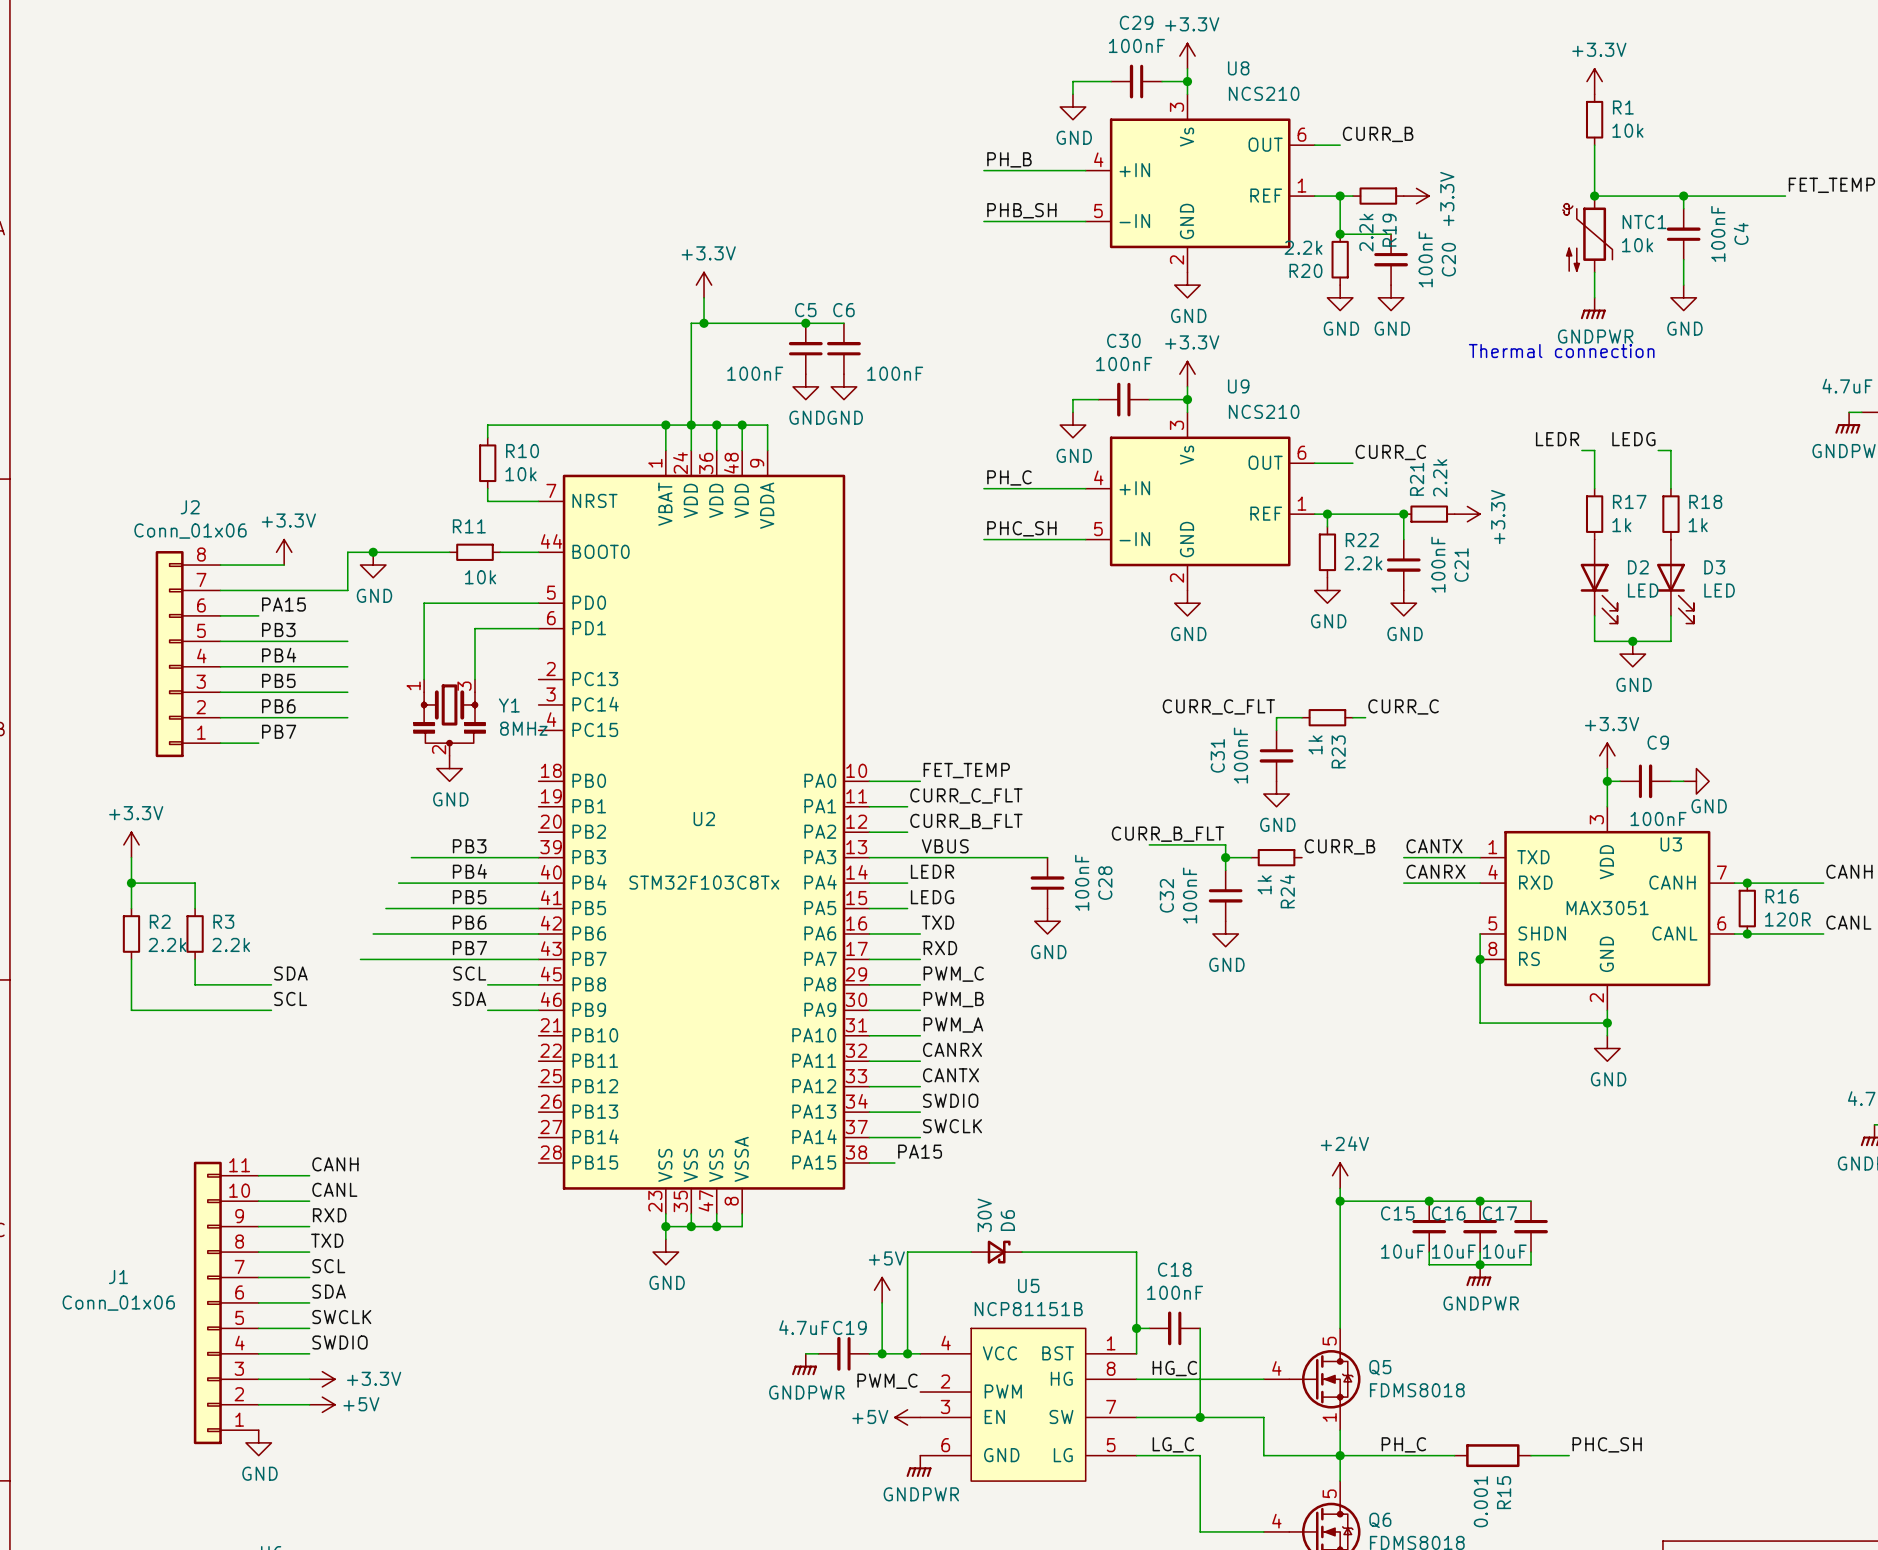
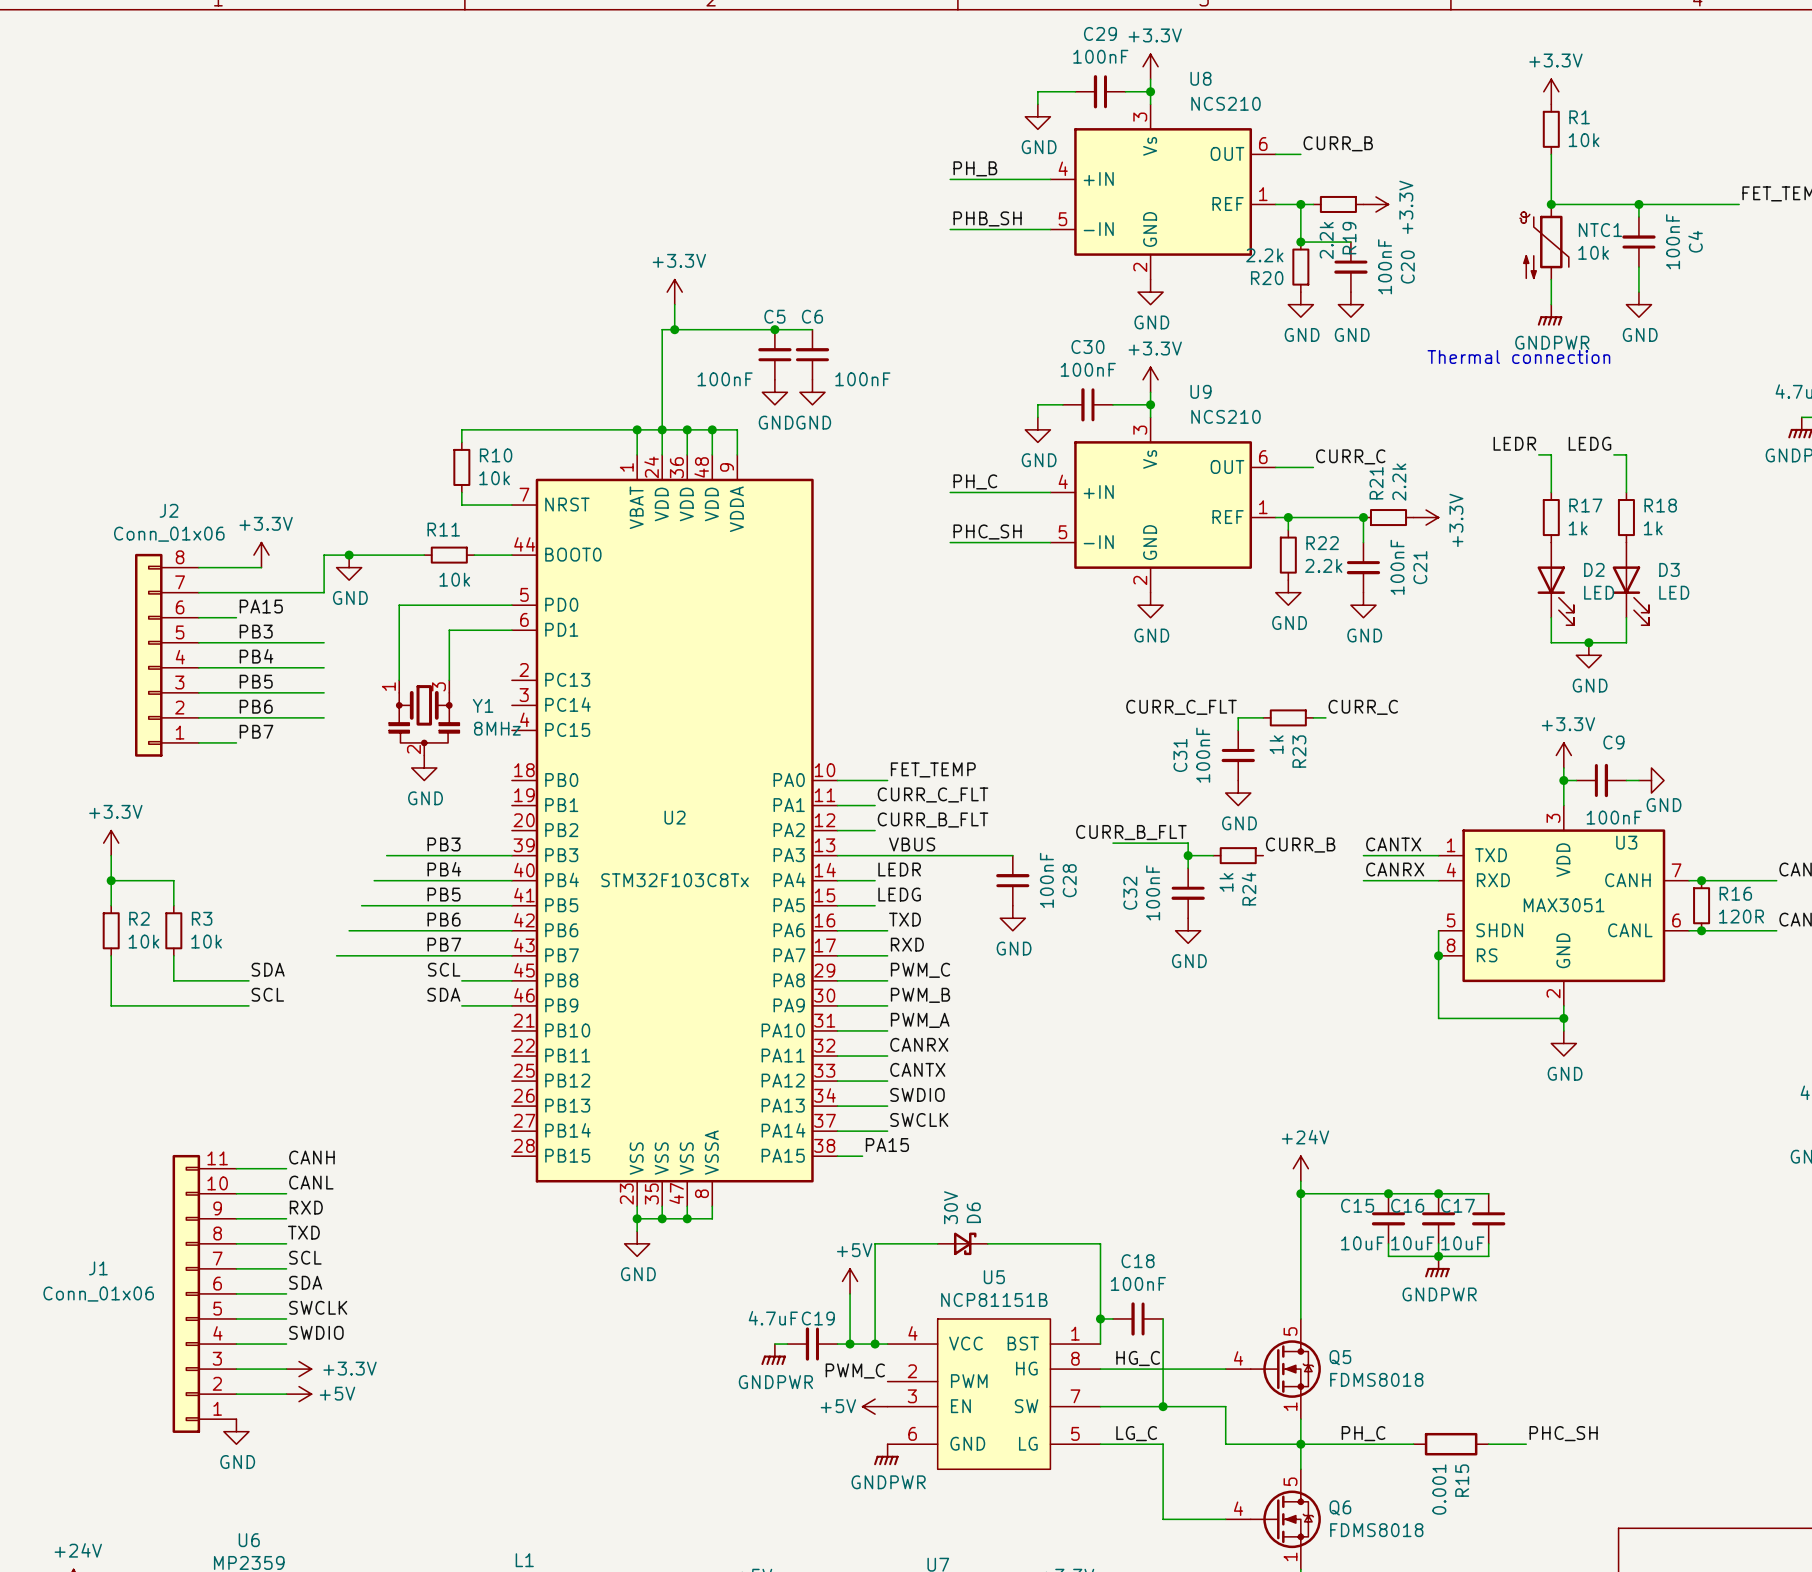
R2 value: 2.2k (167, 944) -> 10k (143, 941)
R3 value: 2.2k (231, 944) -> 10k (206, 941)

